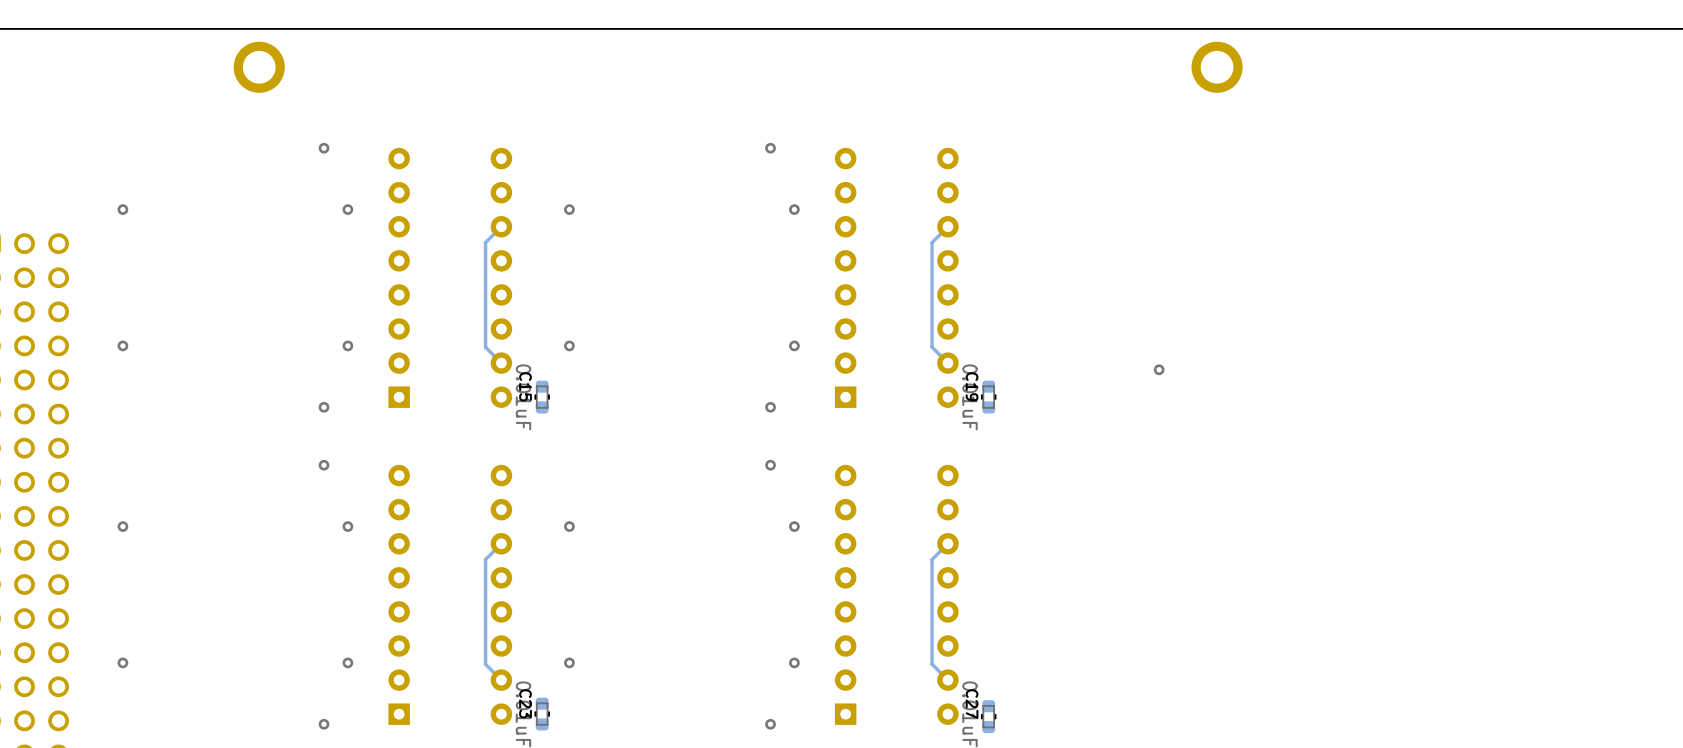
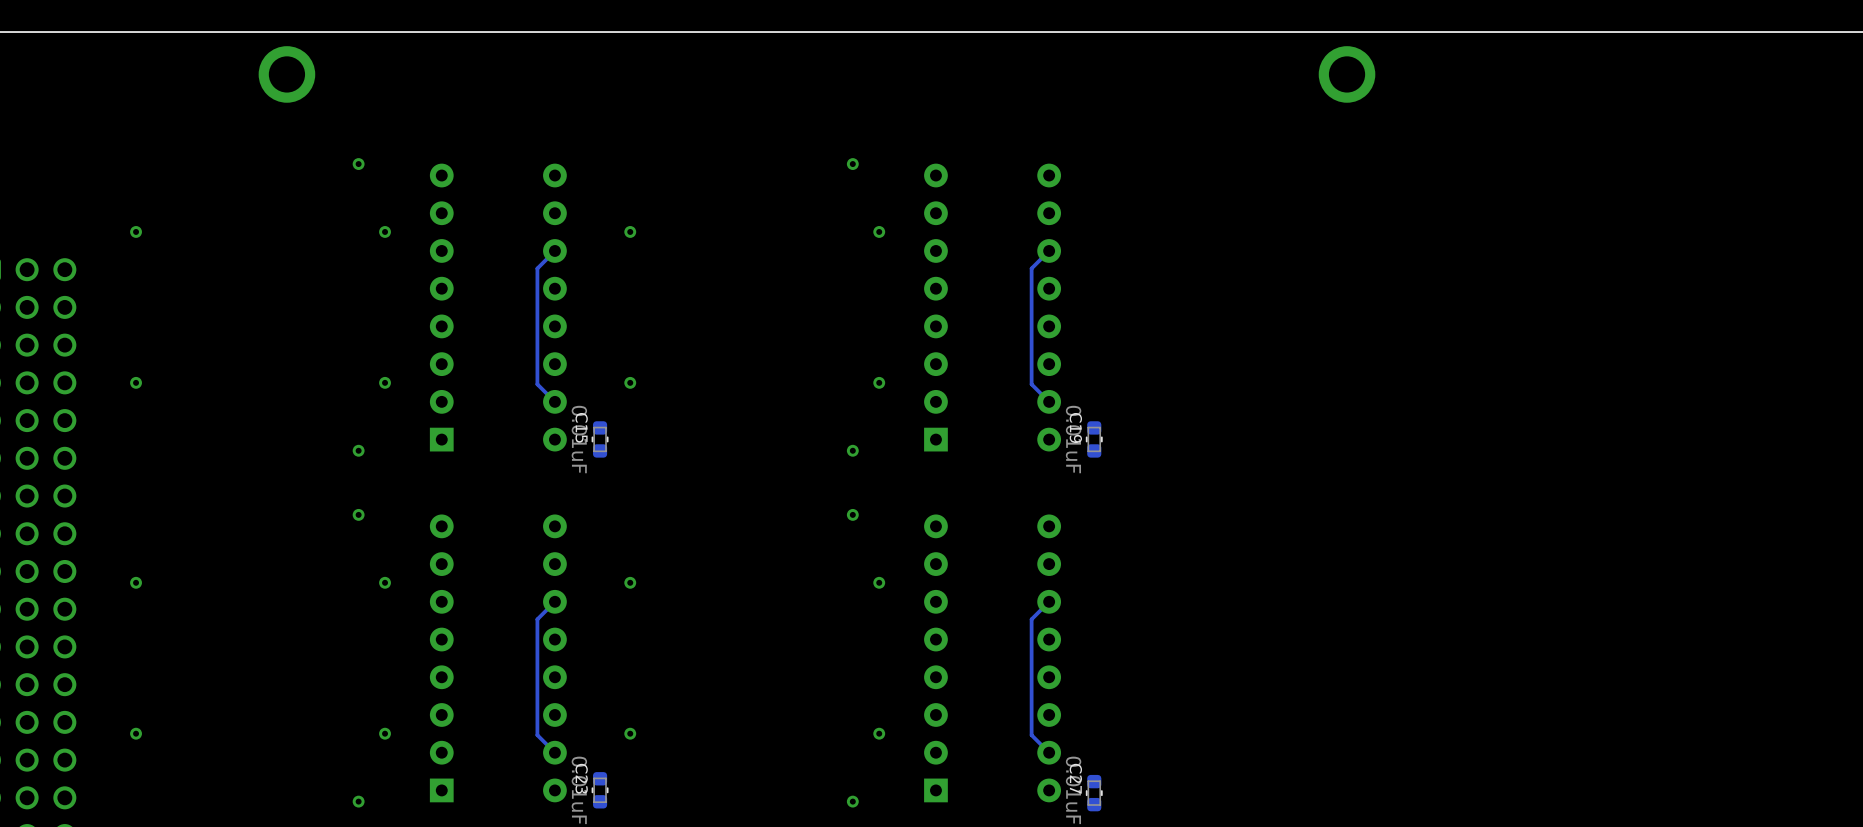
via: (1159, 369) -> none

